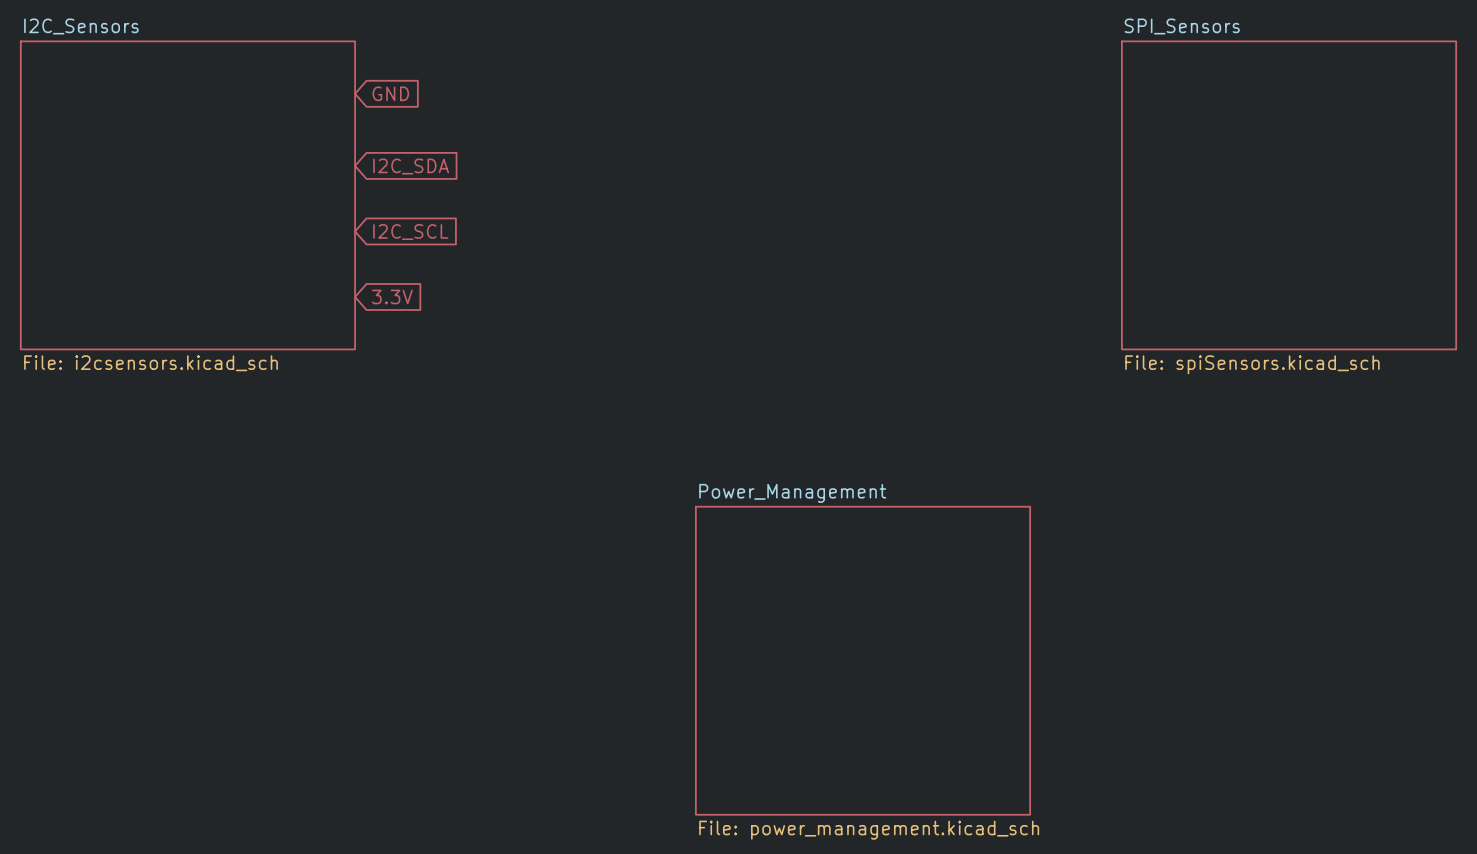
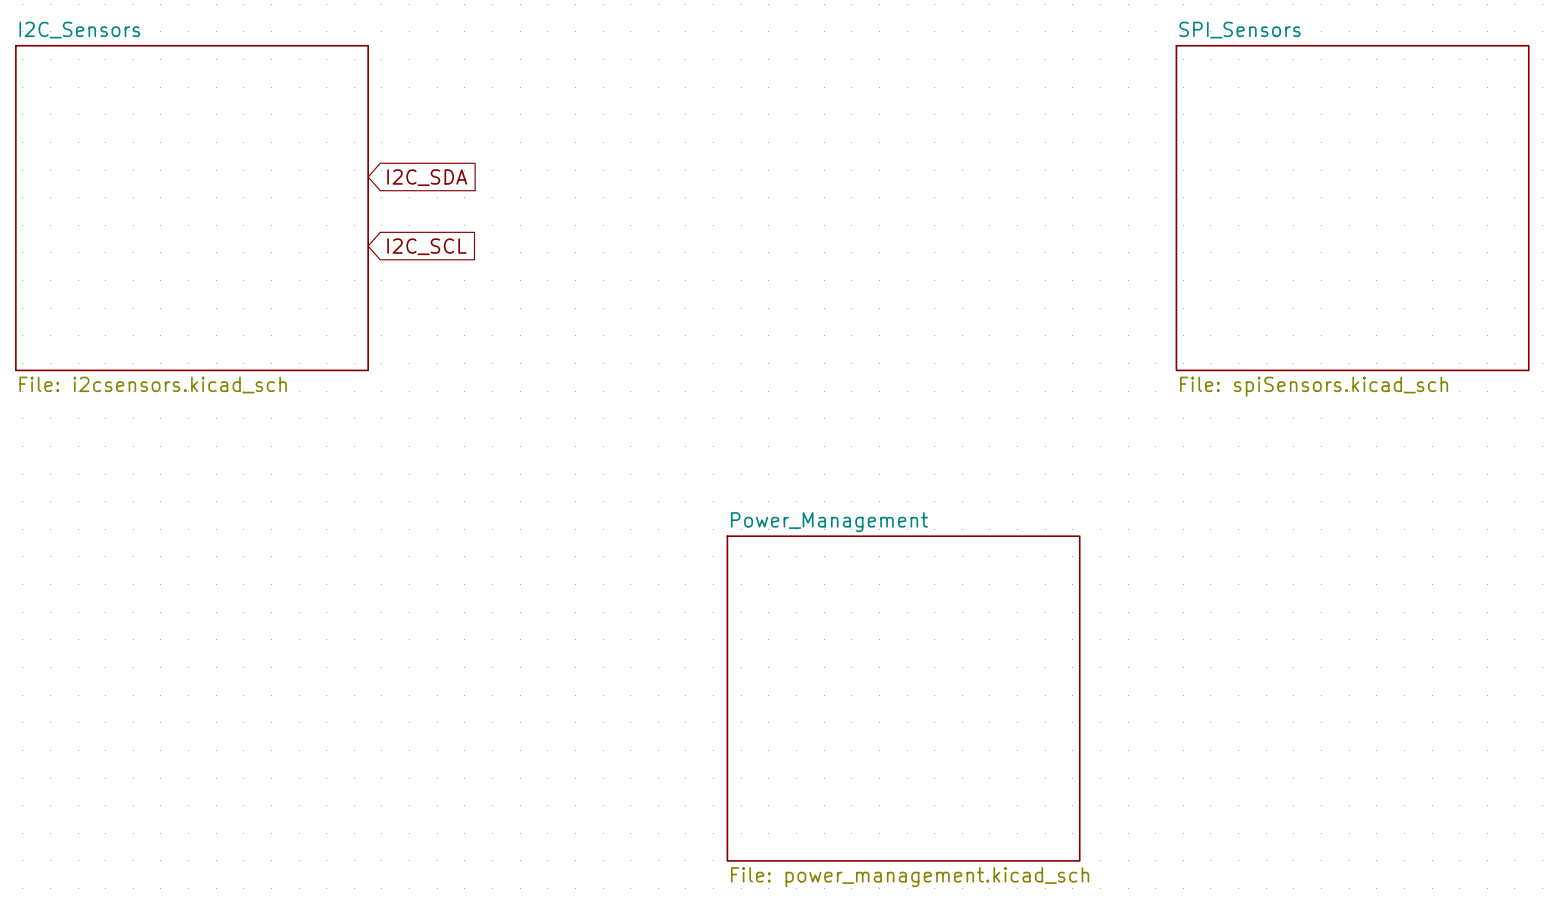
global label: GND (390, 93) -> none
global label: 3.3V (392, 296) -> none

